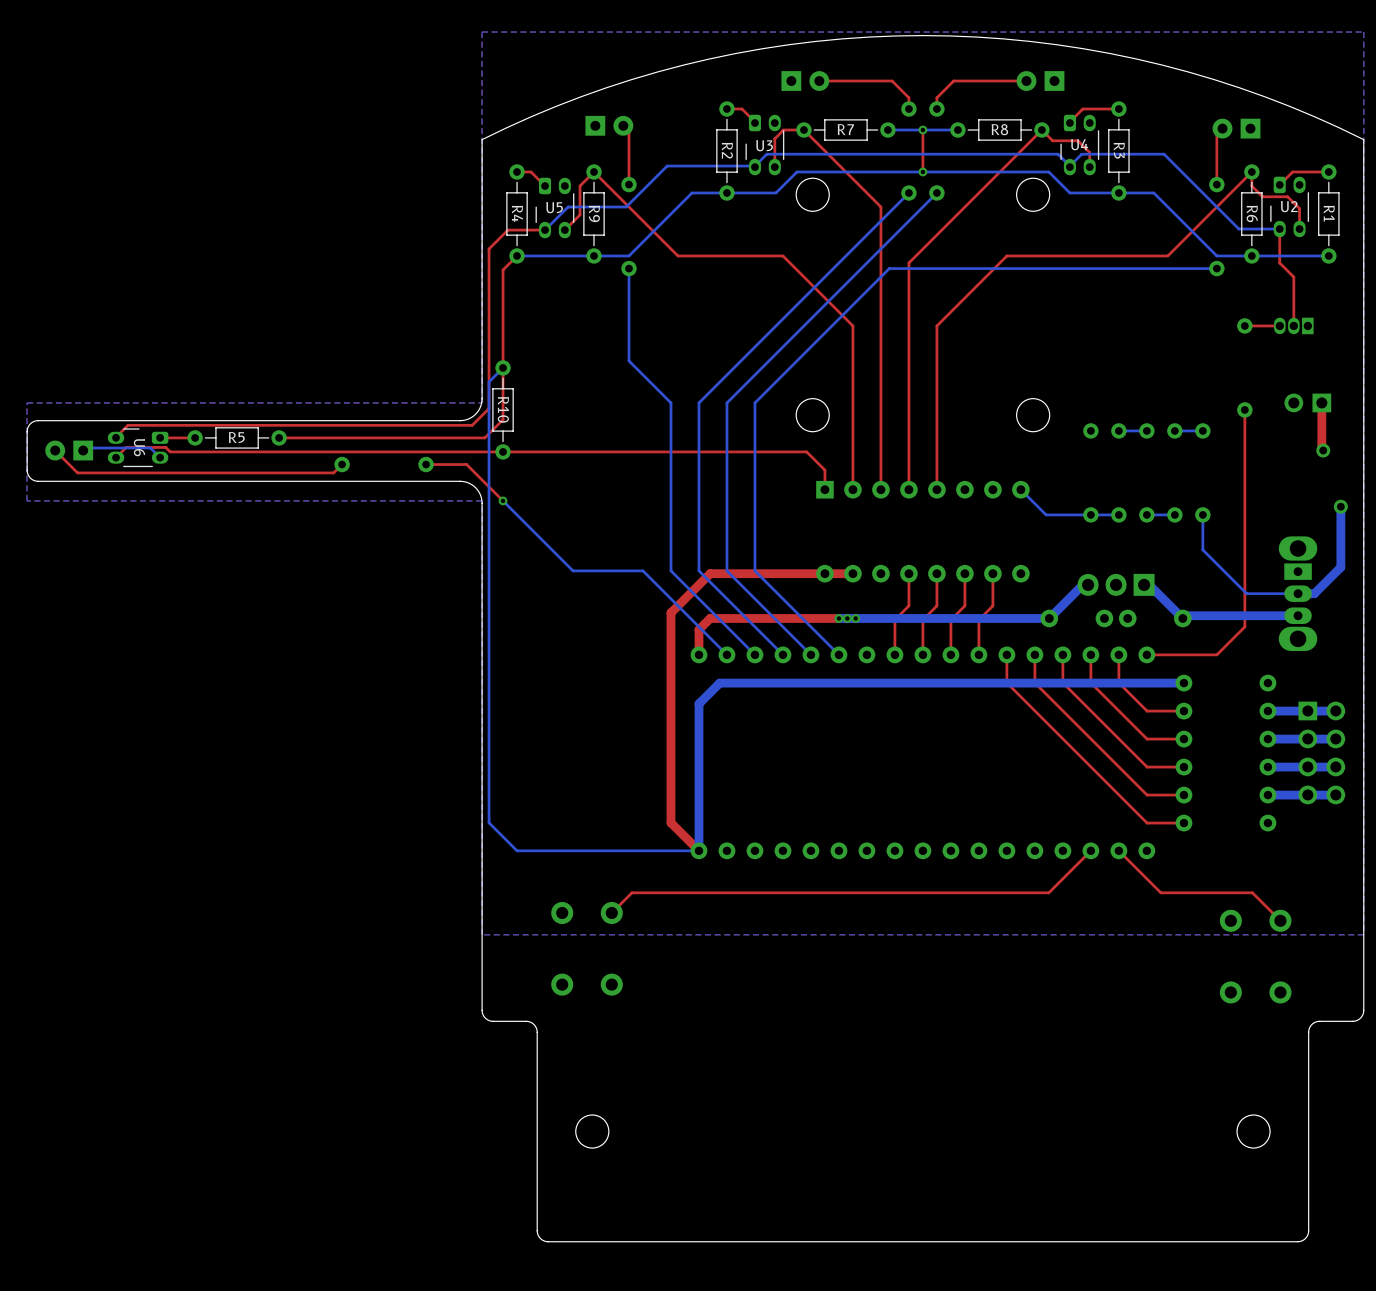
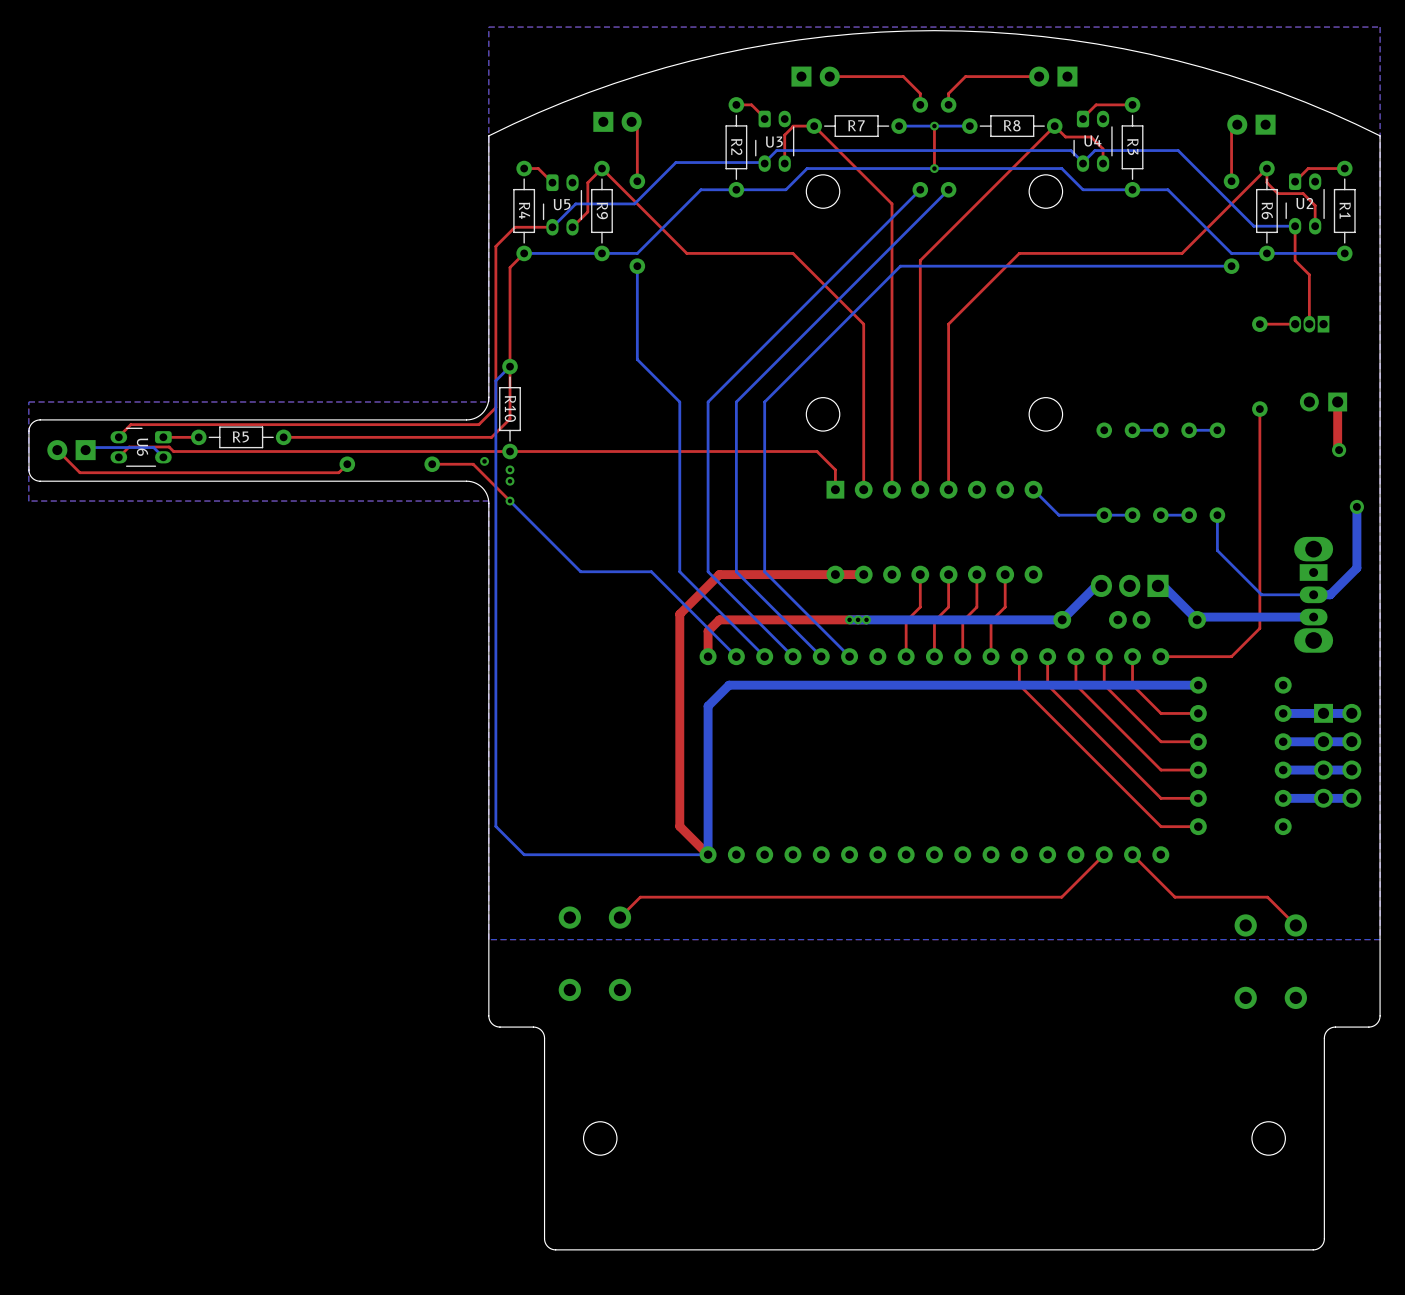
via: none -> (484, 461)
via: none -> (510, 469)
via: none -> (510, 481)

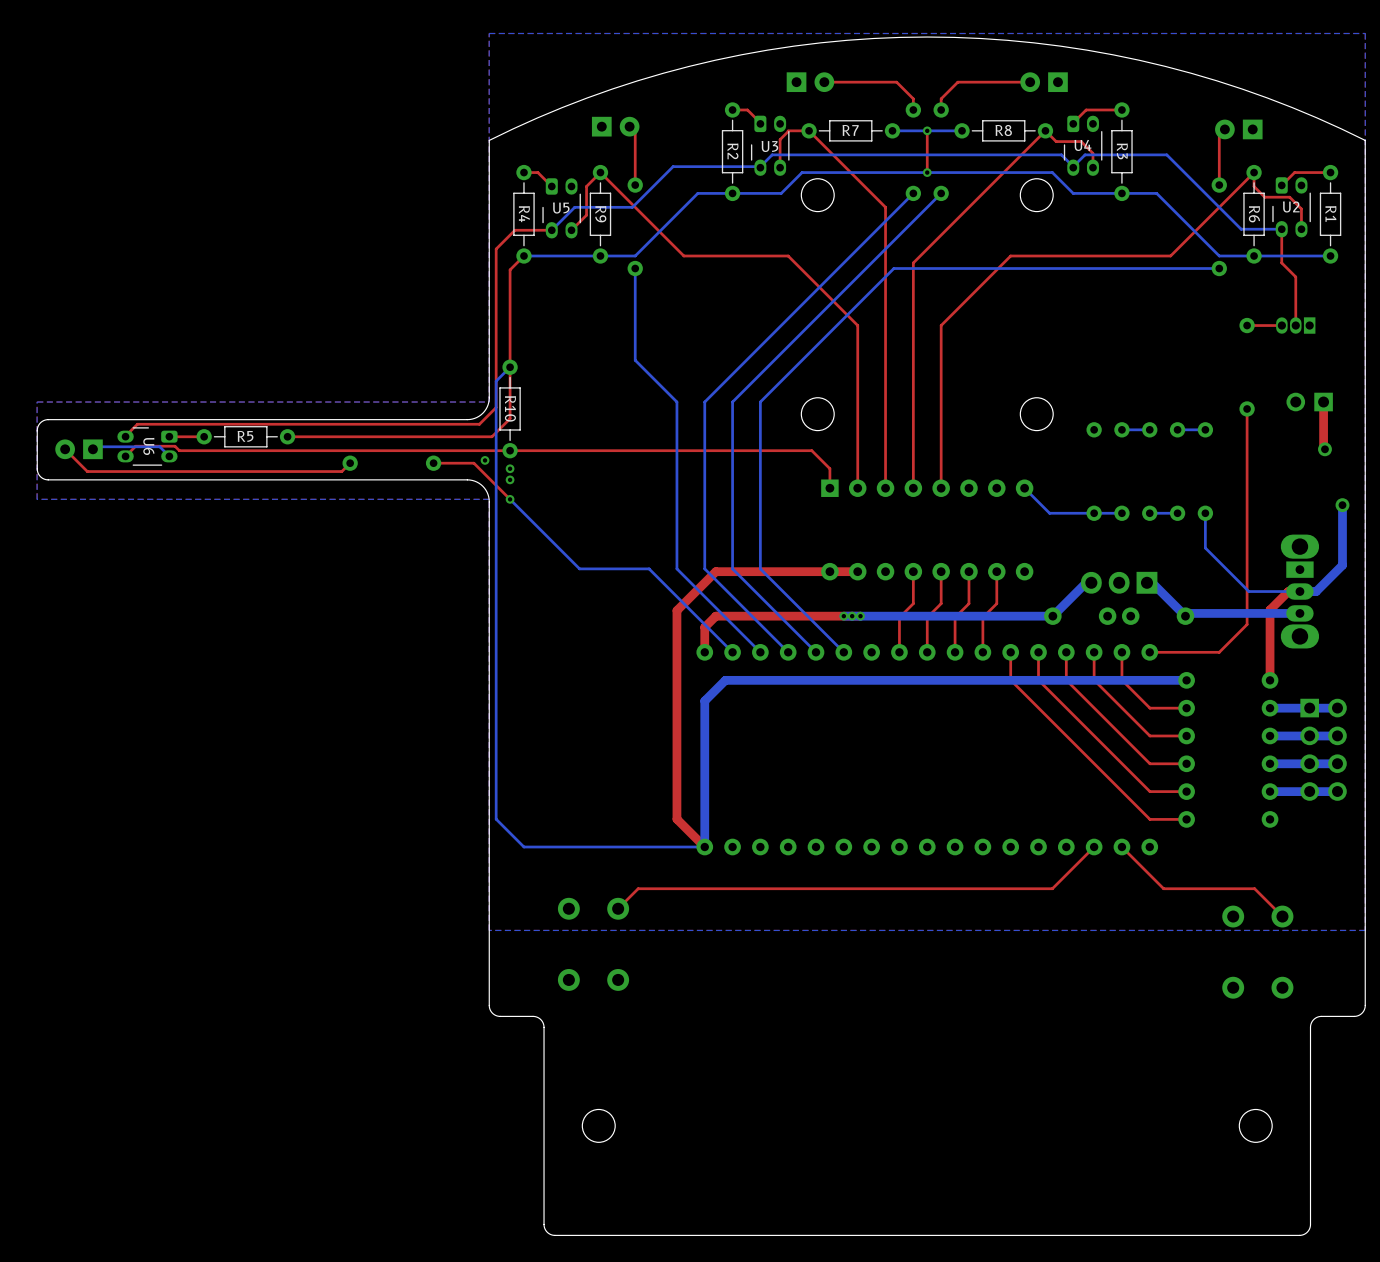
top track: none -> (1299, 591) (1288, 591) (1270, 609) (1270, 680)

